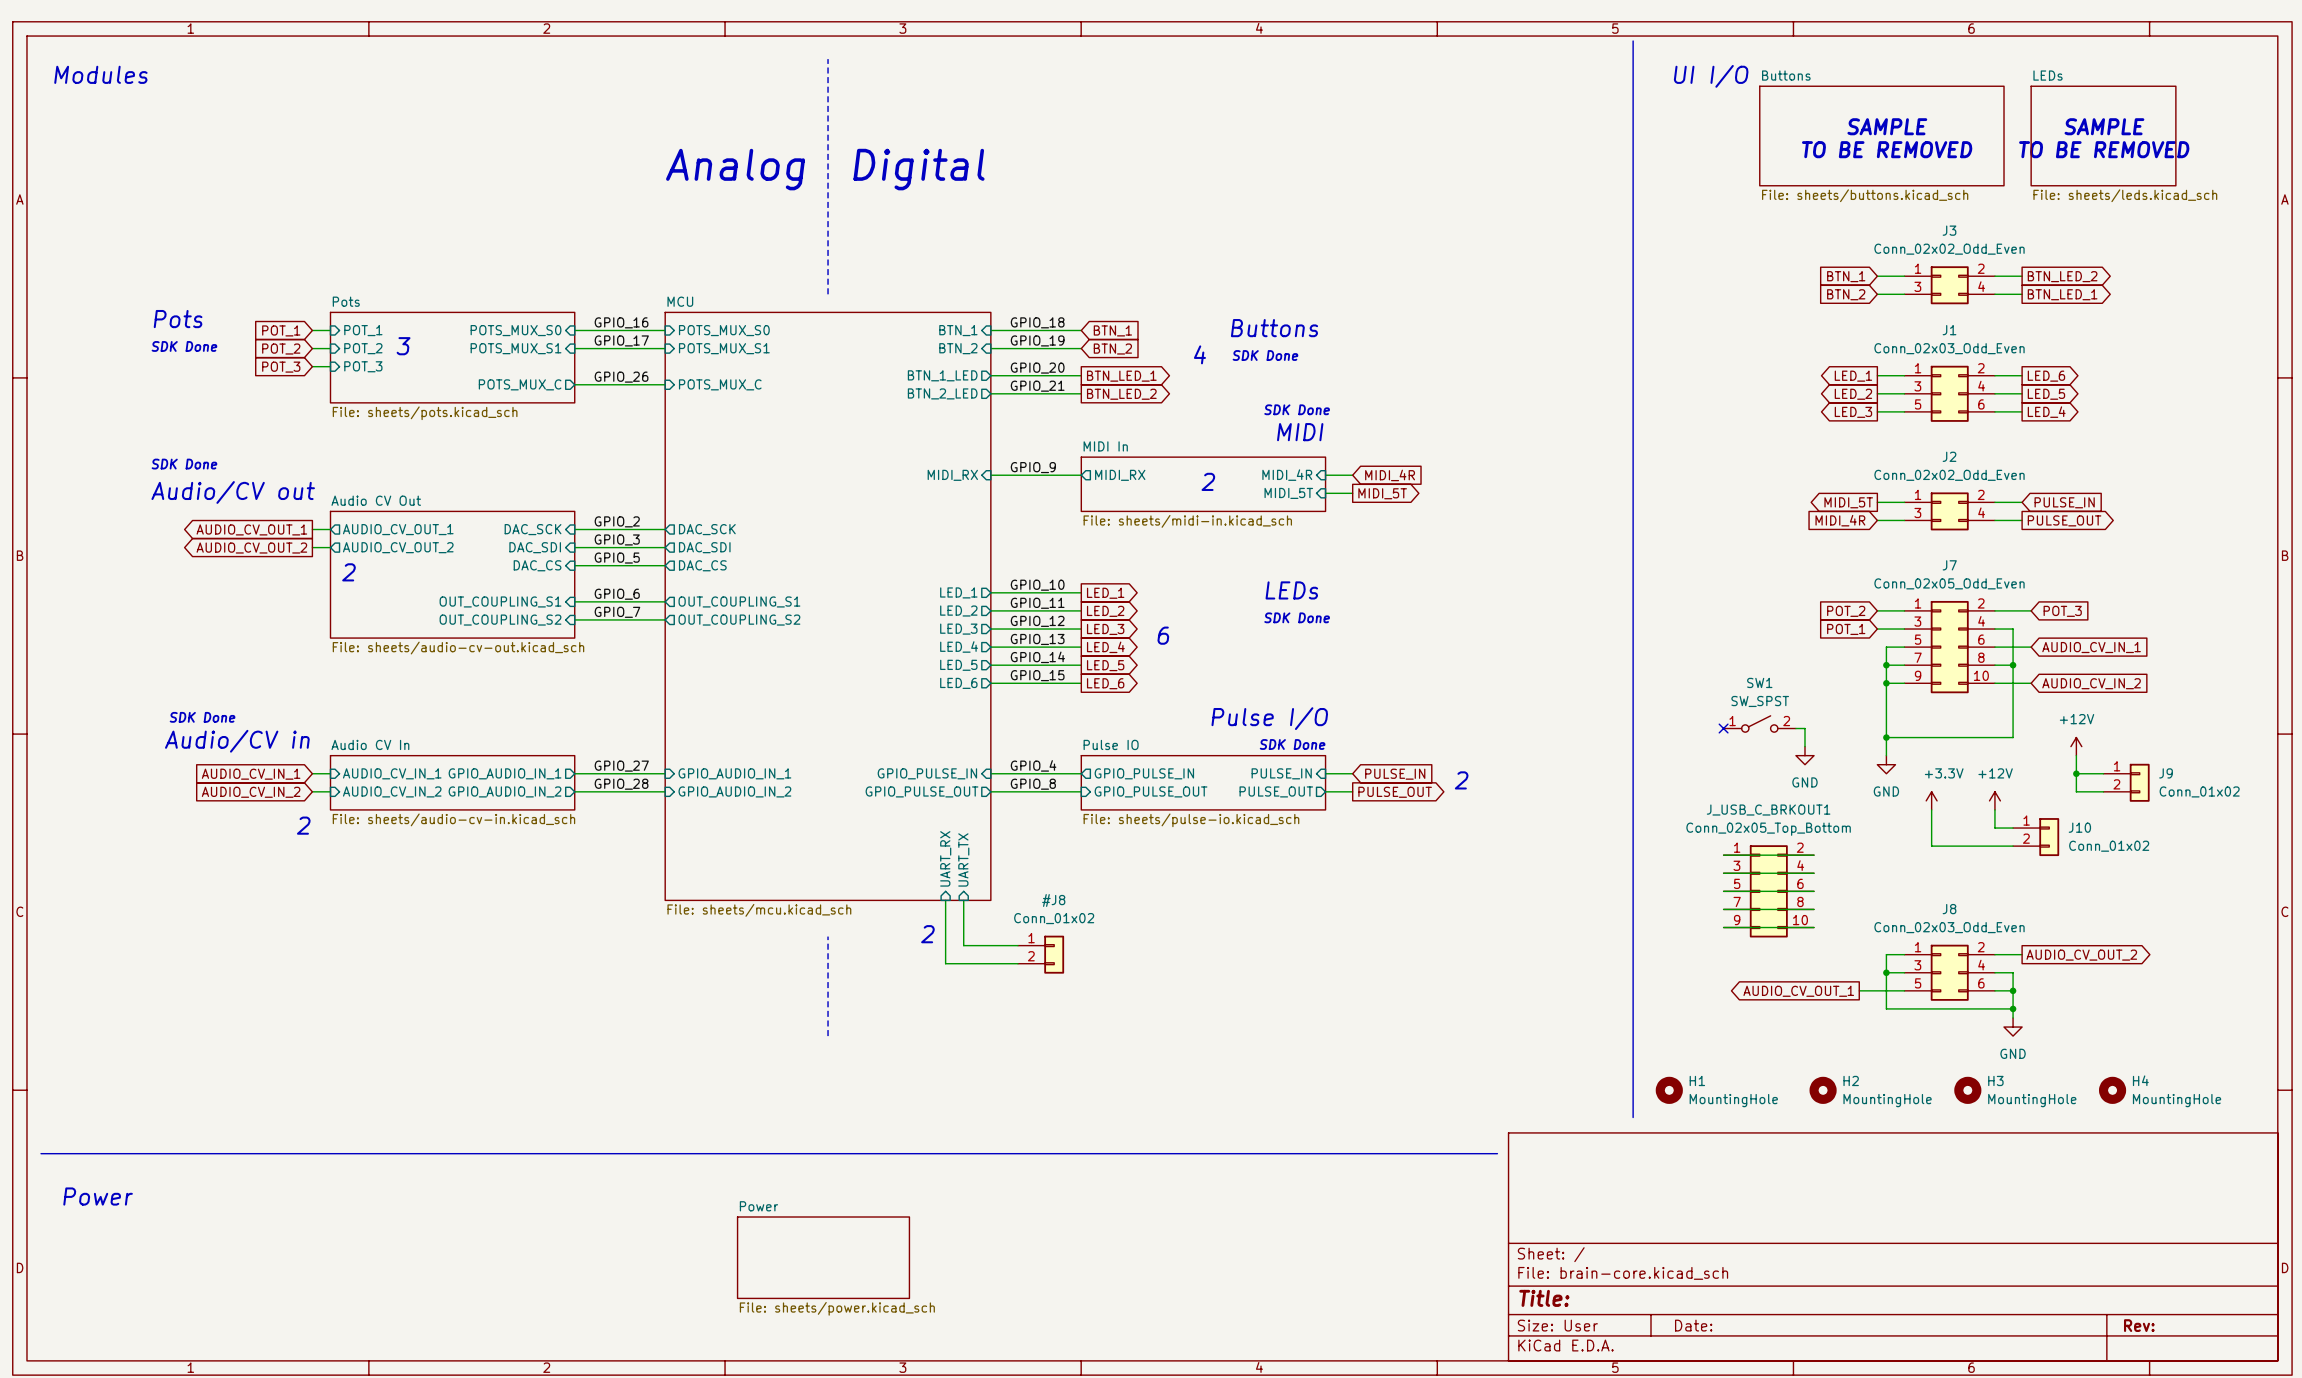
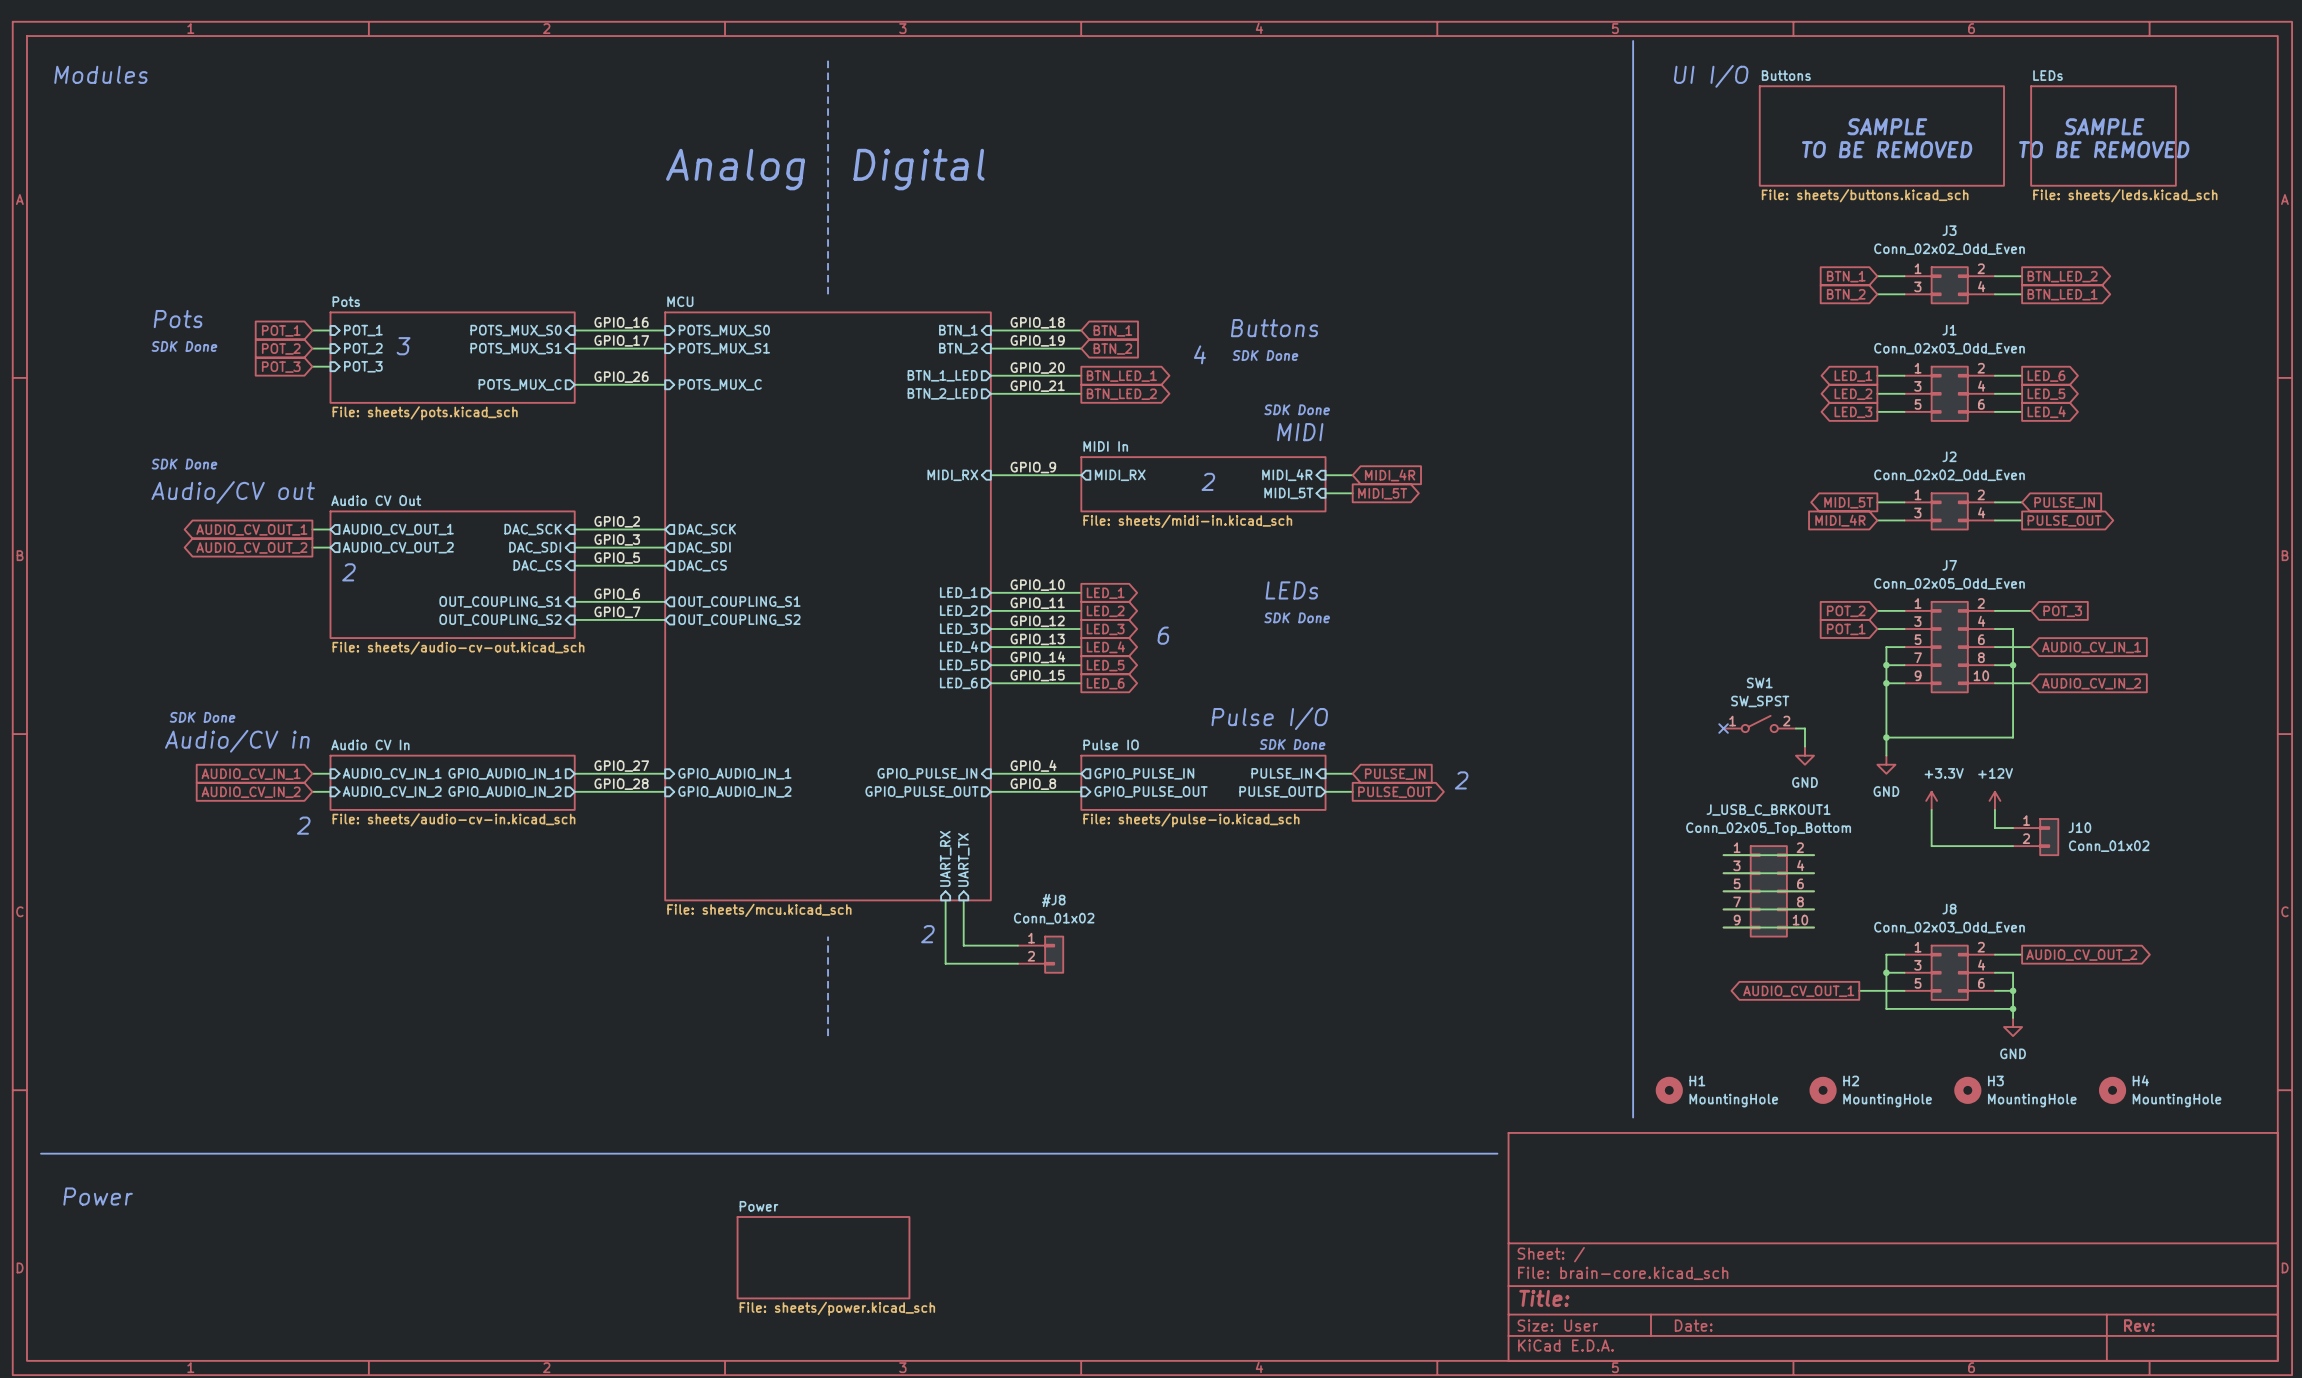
power symbol: +12V (2076, 746) -> none
wire: (2076, 755) (2076, 791) (2103, 791) -> none
wire: (2076, 773) (2103, 773) -> none
junction: (2076, 773) -> none
J9: Conn_01x02 (2126, 782) -> none

